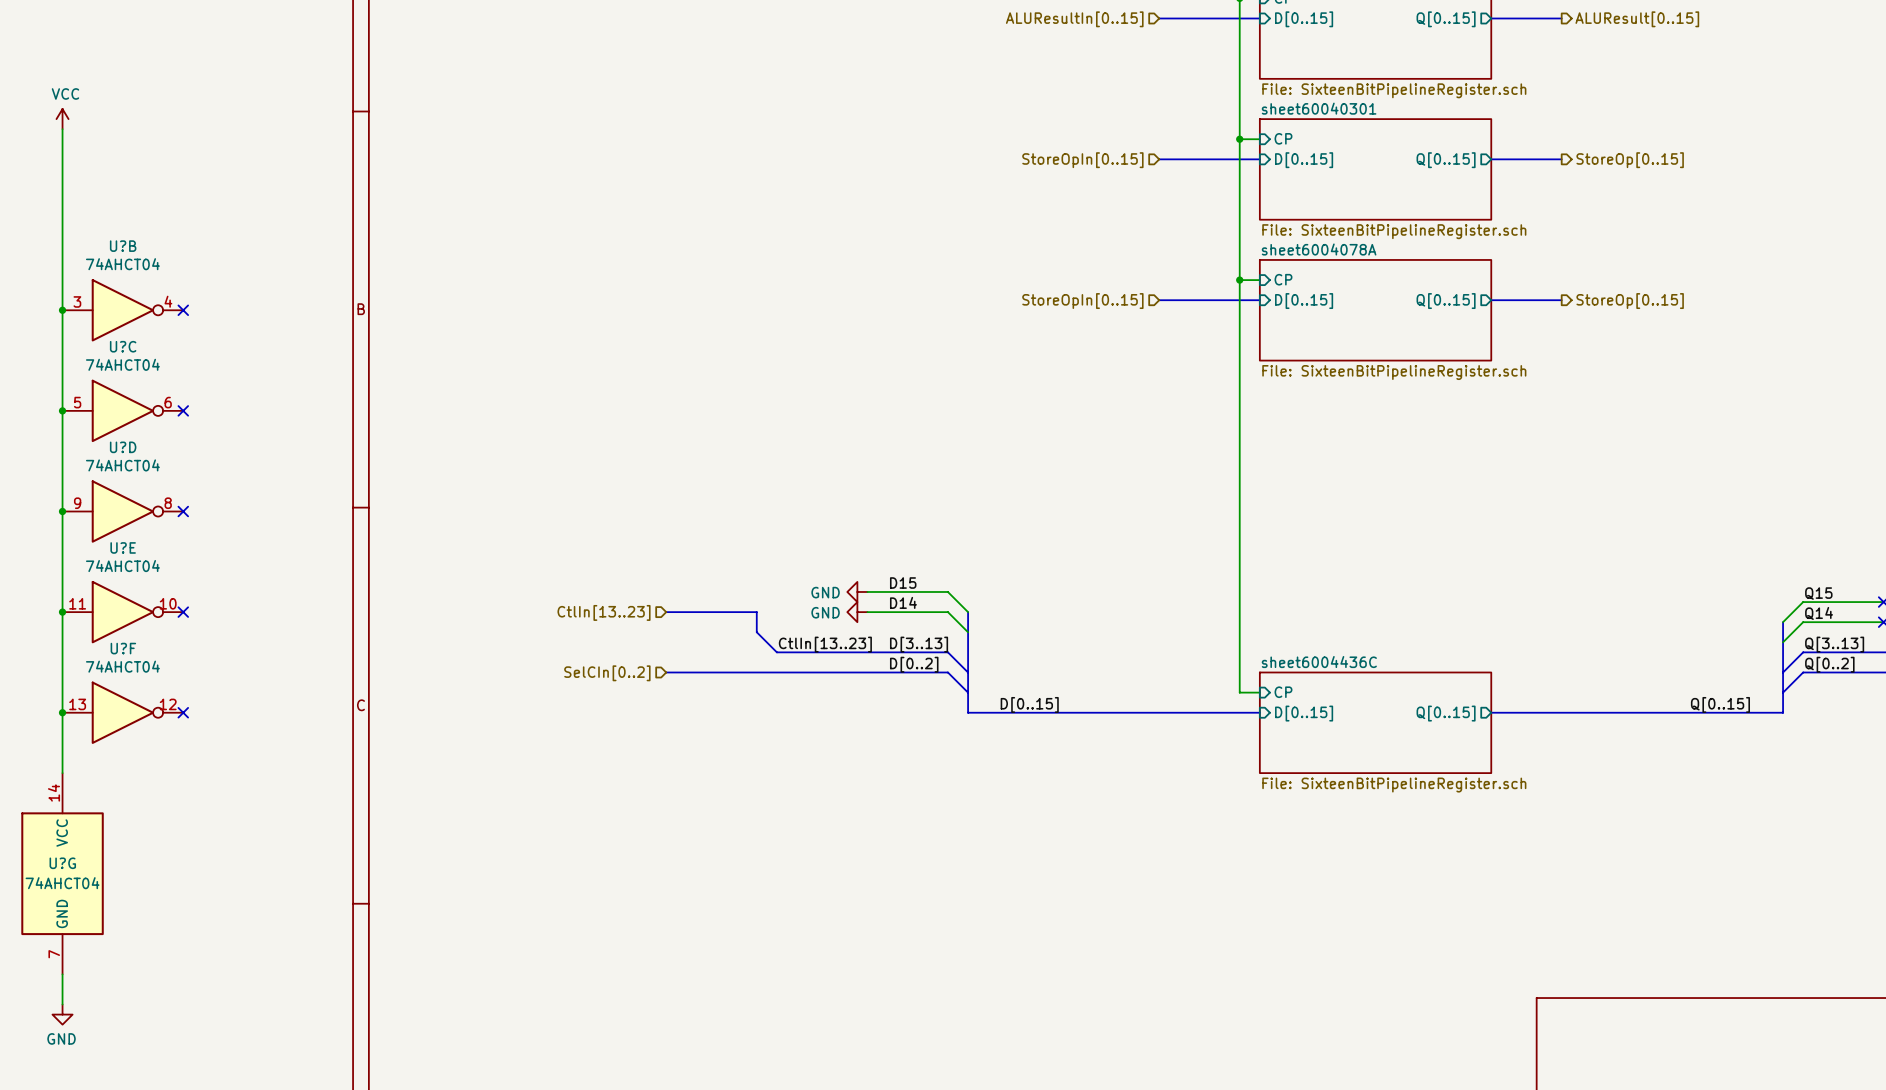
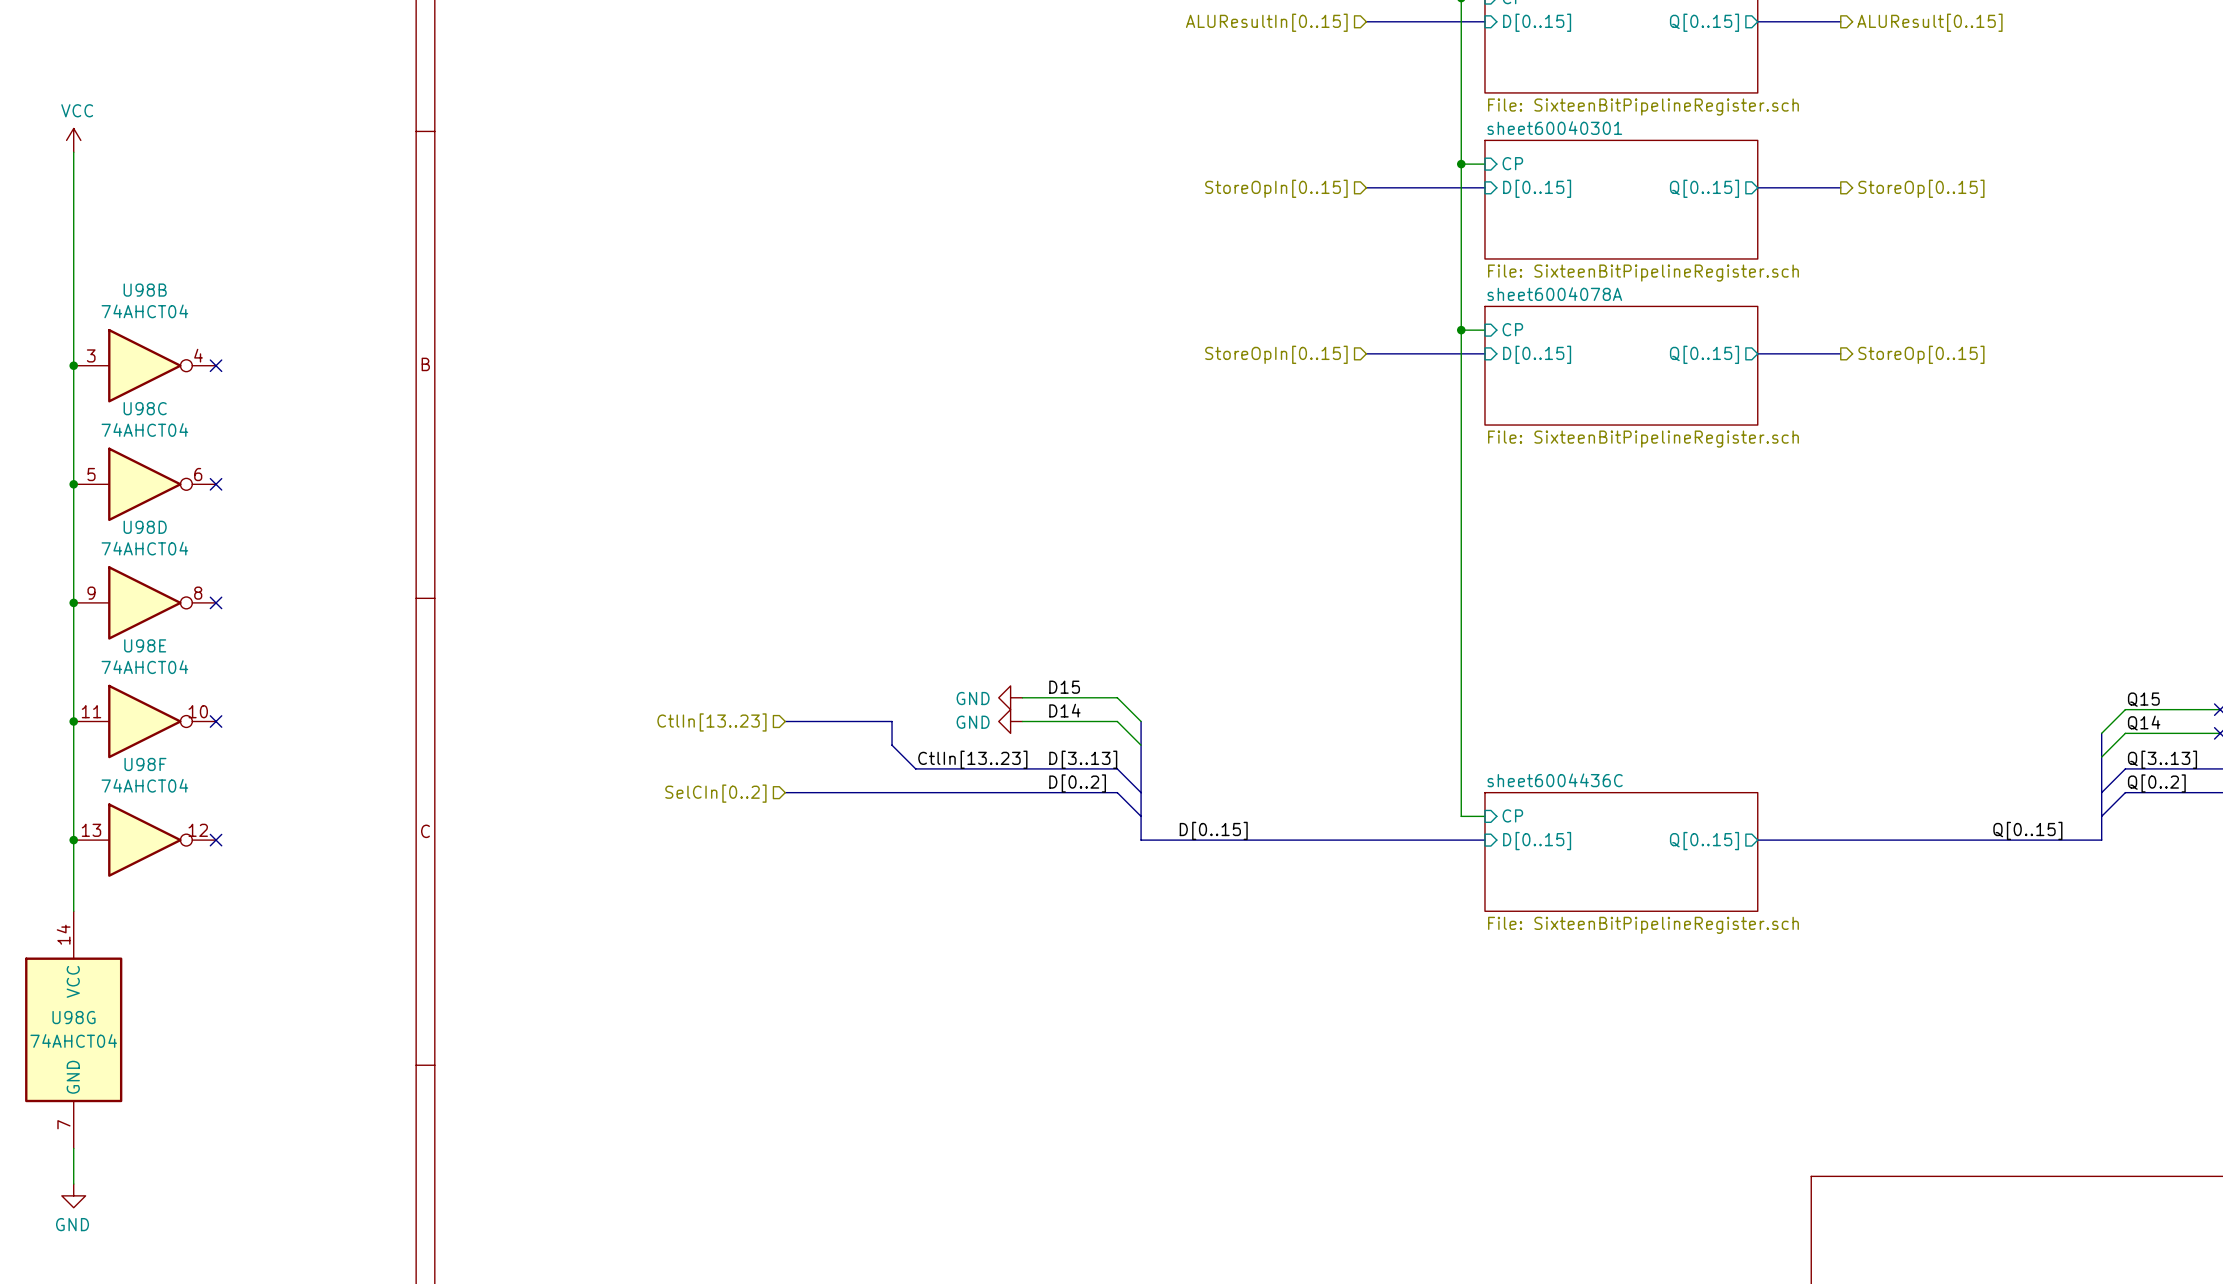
U?B name: U?B (123, 246) -> U98B (145, 290)
U?C name: U?C (123, 346) -> U98C (145, 408)
U?D name: U?D (123, 447) -> U98D (145, 527)
U?E name: U?E (123, 547) -> U98E (145, 645)
U?F name: U?F (123, 648) -> U98F (145, 764)
U?G name: U?G (62, 863) -> U98G (73, 1017)

